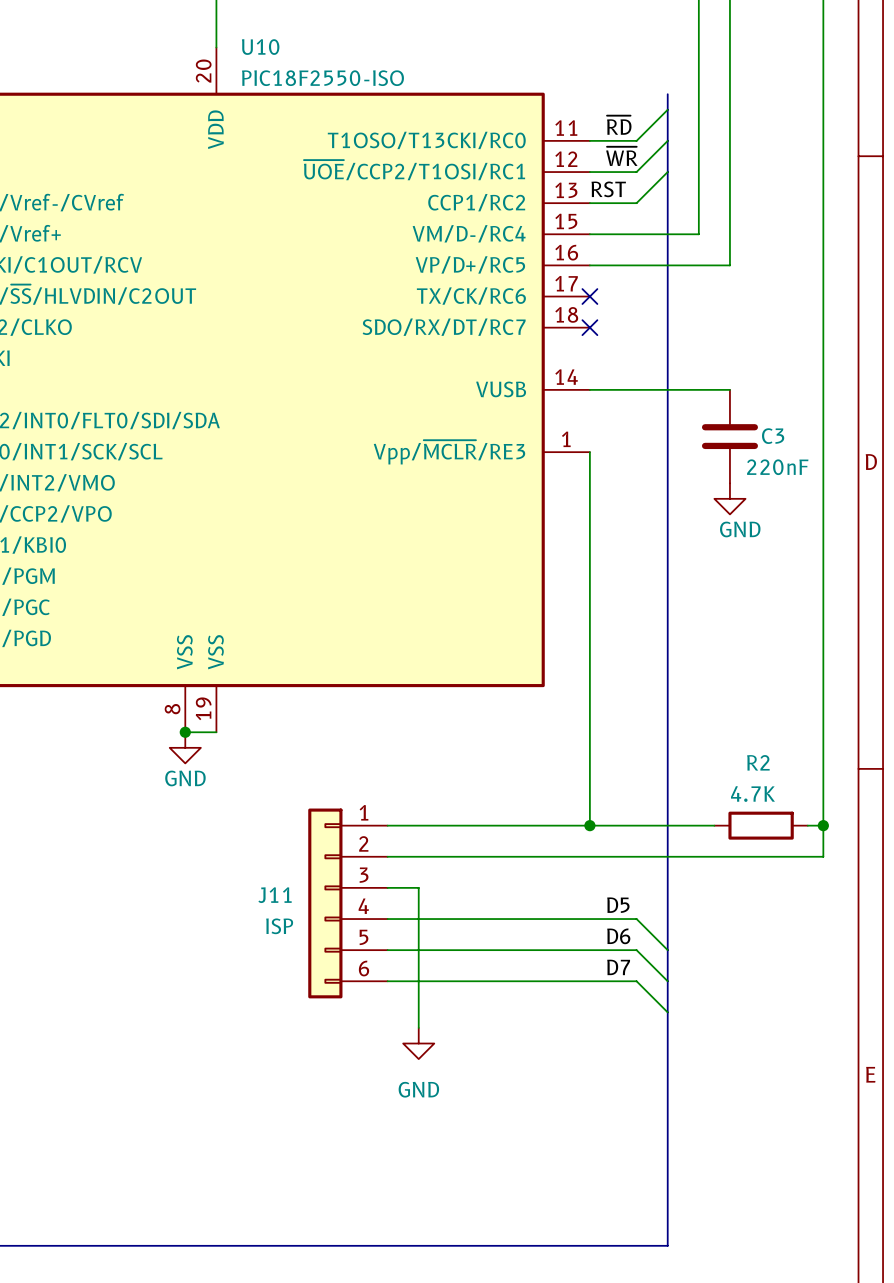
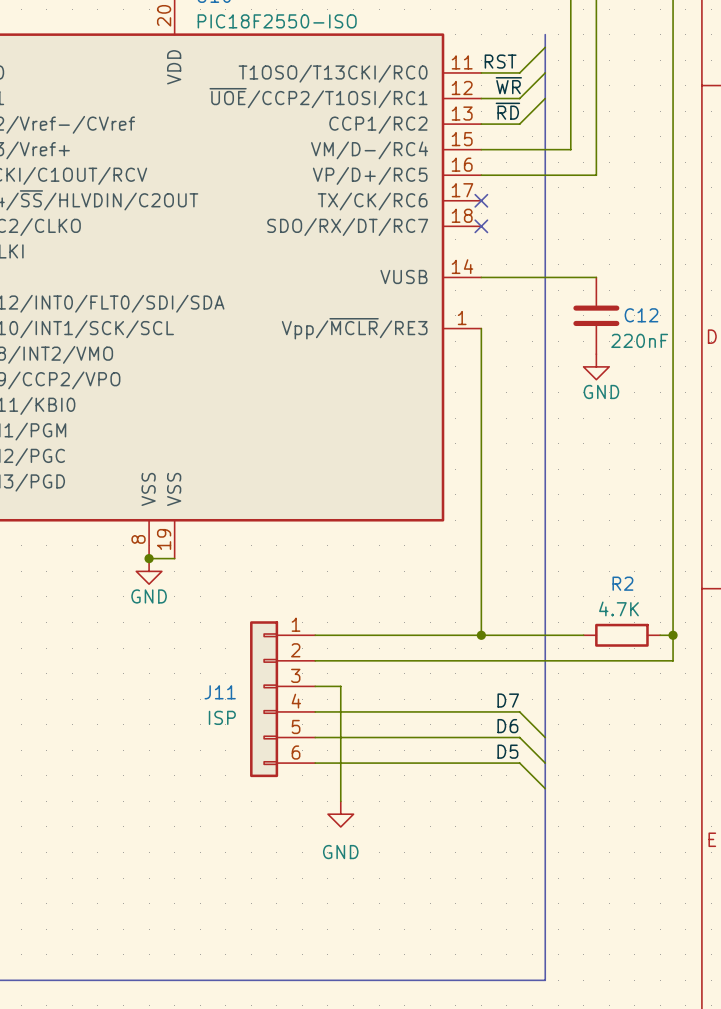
label position: ~{RD} (619, 125) -> ~{RD} (507, 111)
label position: RST (608, 189) -> RST (500, 61)
C3 name: C3 (773, 436) -> C12 (641, 315)
label: D5 (618, 905) -> D7 (508, 700)
label: D7 (618, 967) -> D5 (507, 751)

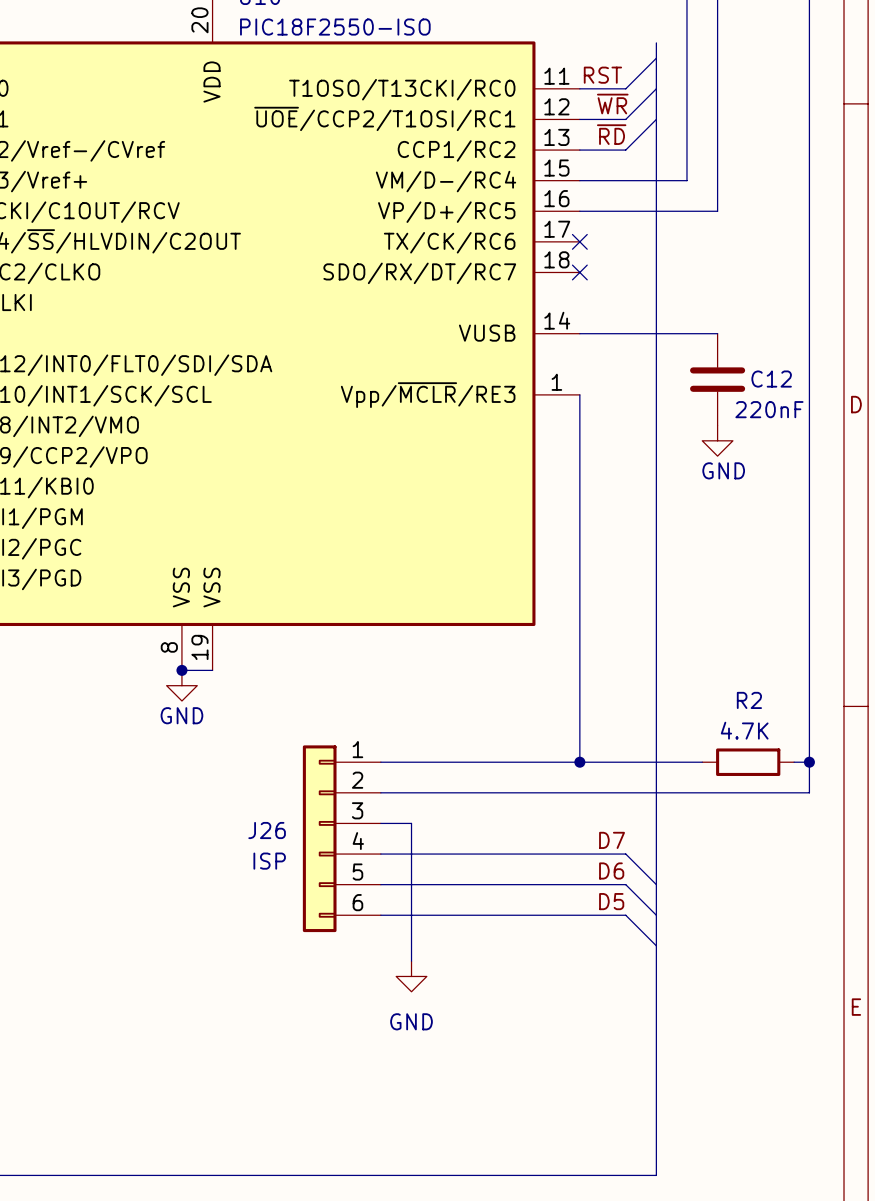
J11 name: J11 (220, 692) -> J26 (267, 830)

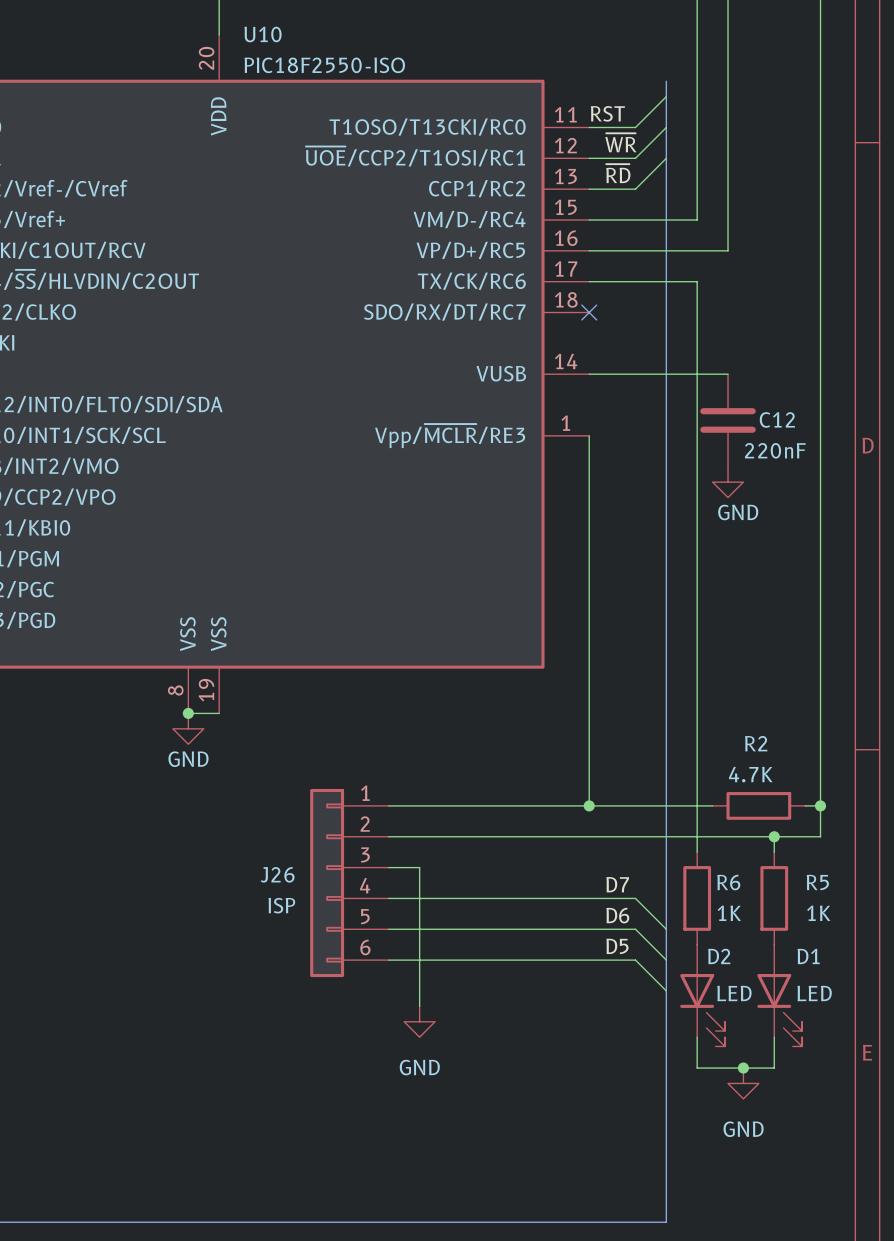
wire: none -> (589, 281) (697, 281) (697, 852)
no-connect mark: (579, 241) -> none
wire: none -> (774, 836) (774, 852)
junction: none -> (774, 836)
R6: none -> 1K (697, 898)
R5: none -> 1K (774, 898)
D2: none -> LED (702, 995)
D1: none -> LED (779, 995)
wire: none -> (697, 1037) (697, 1068) (774, 1068) (774, 1037)
junction: none -> (743, 1068)
power symbol: none -> GND (743, 1083)

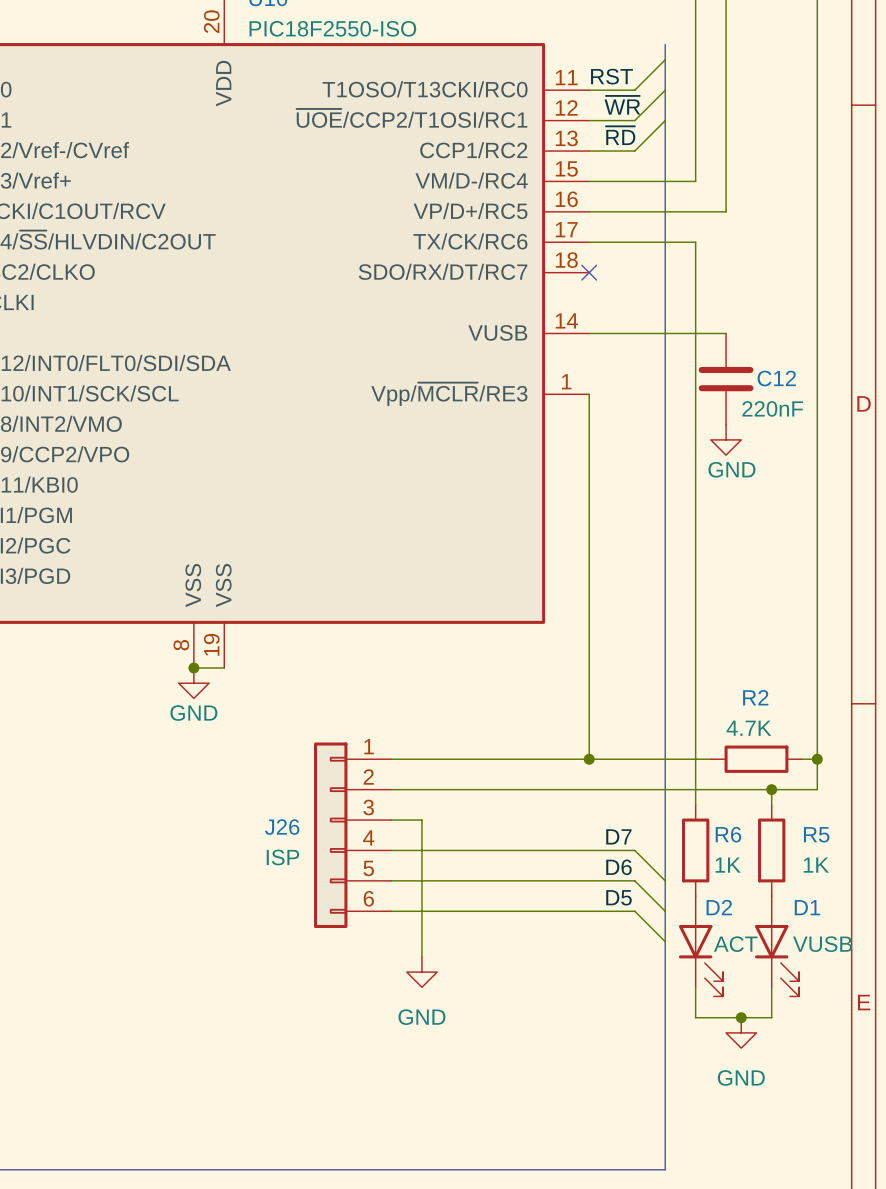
D2 value: LED (734, 993) -> ACT (735, 944)
D1 value: LED (814, 993) -> VUSB (822, 944)

